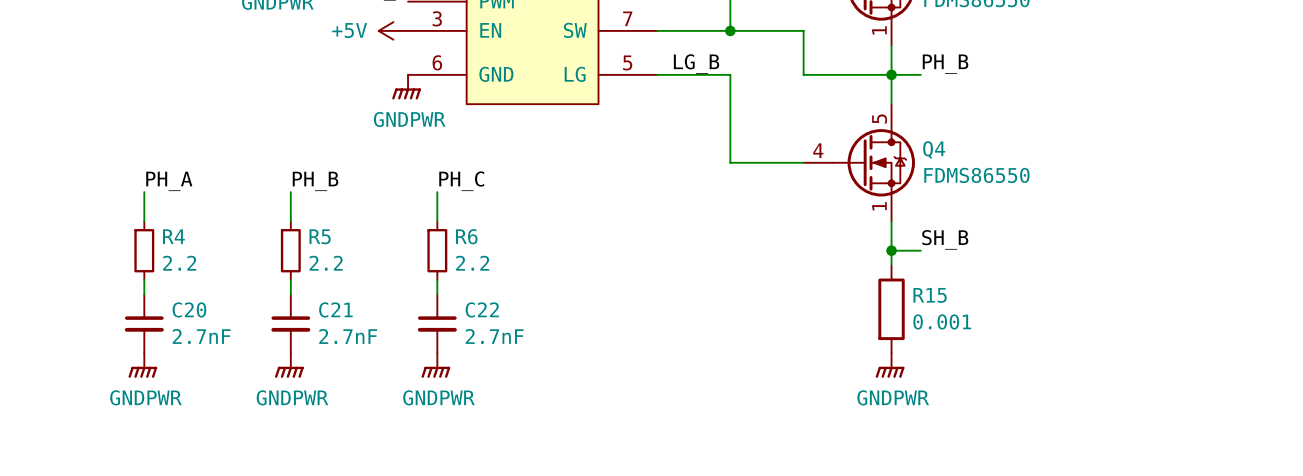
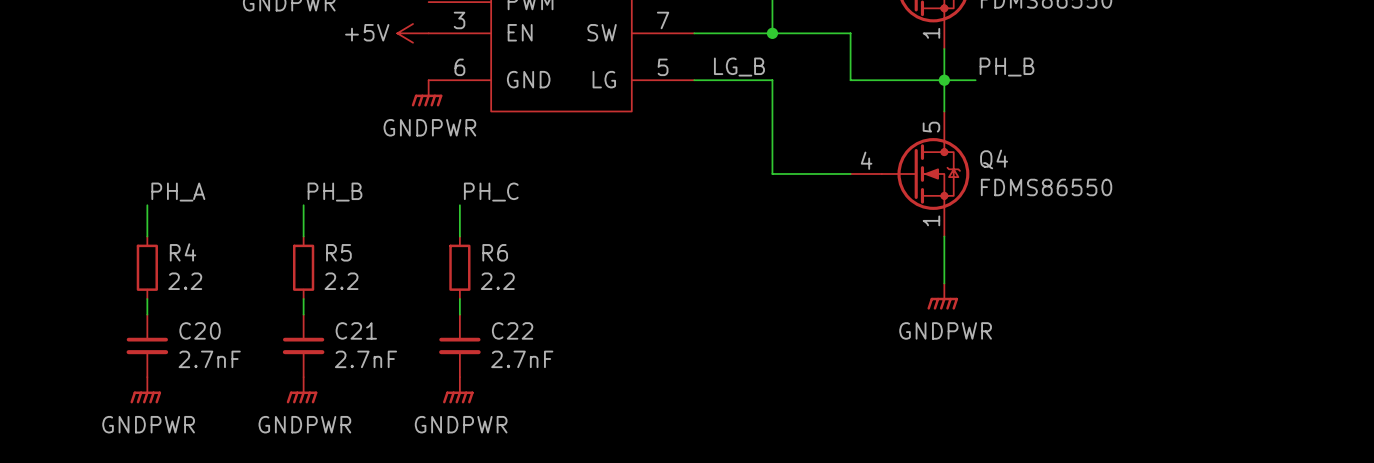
label: SH_B (945, 239) -> none
wire: (891, 250) (920, 250) -> none
junction: (891, 250) -> none
R15: 0.001 (891, 309) -> none
power symbol position: GNDPWR (890, 365) -> GNDPWR (942, 296)

